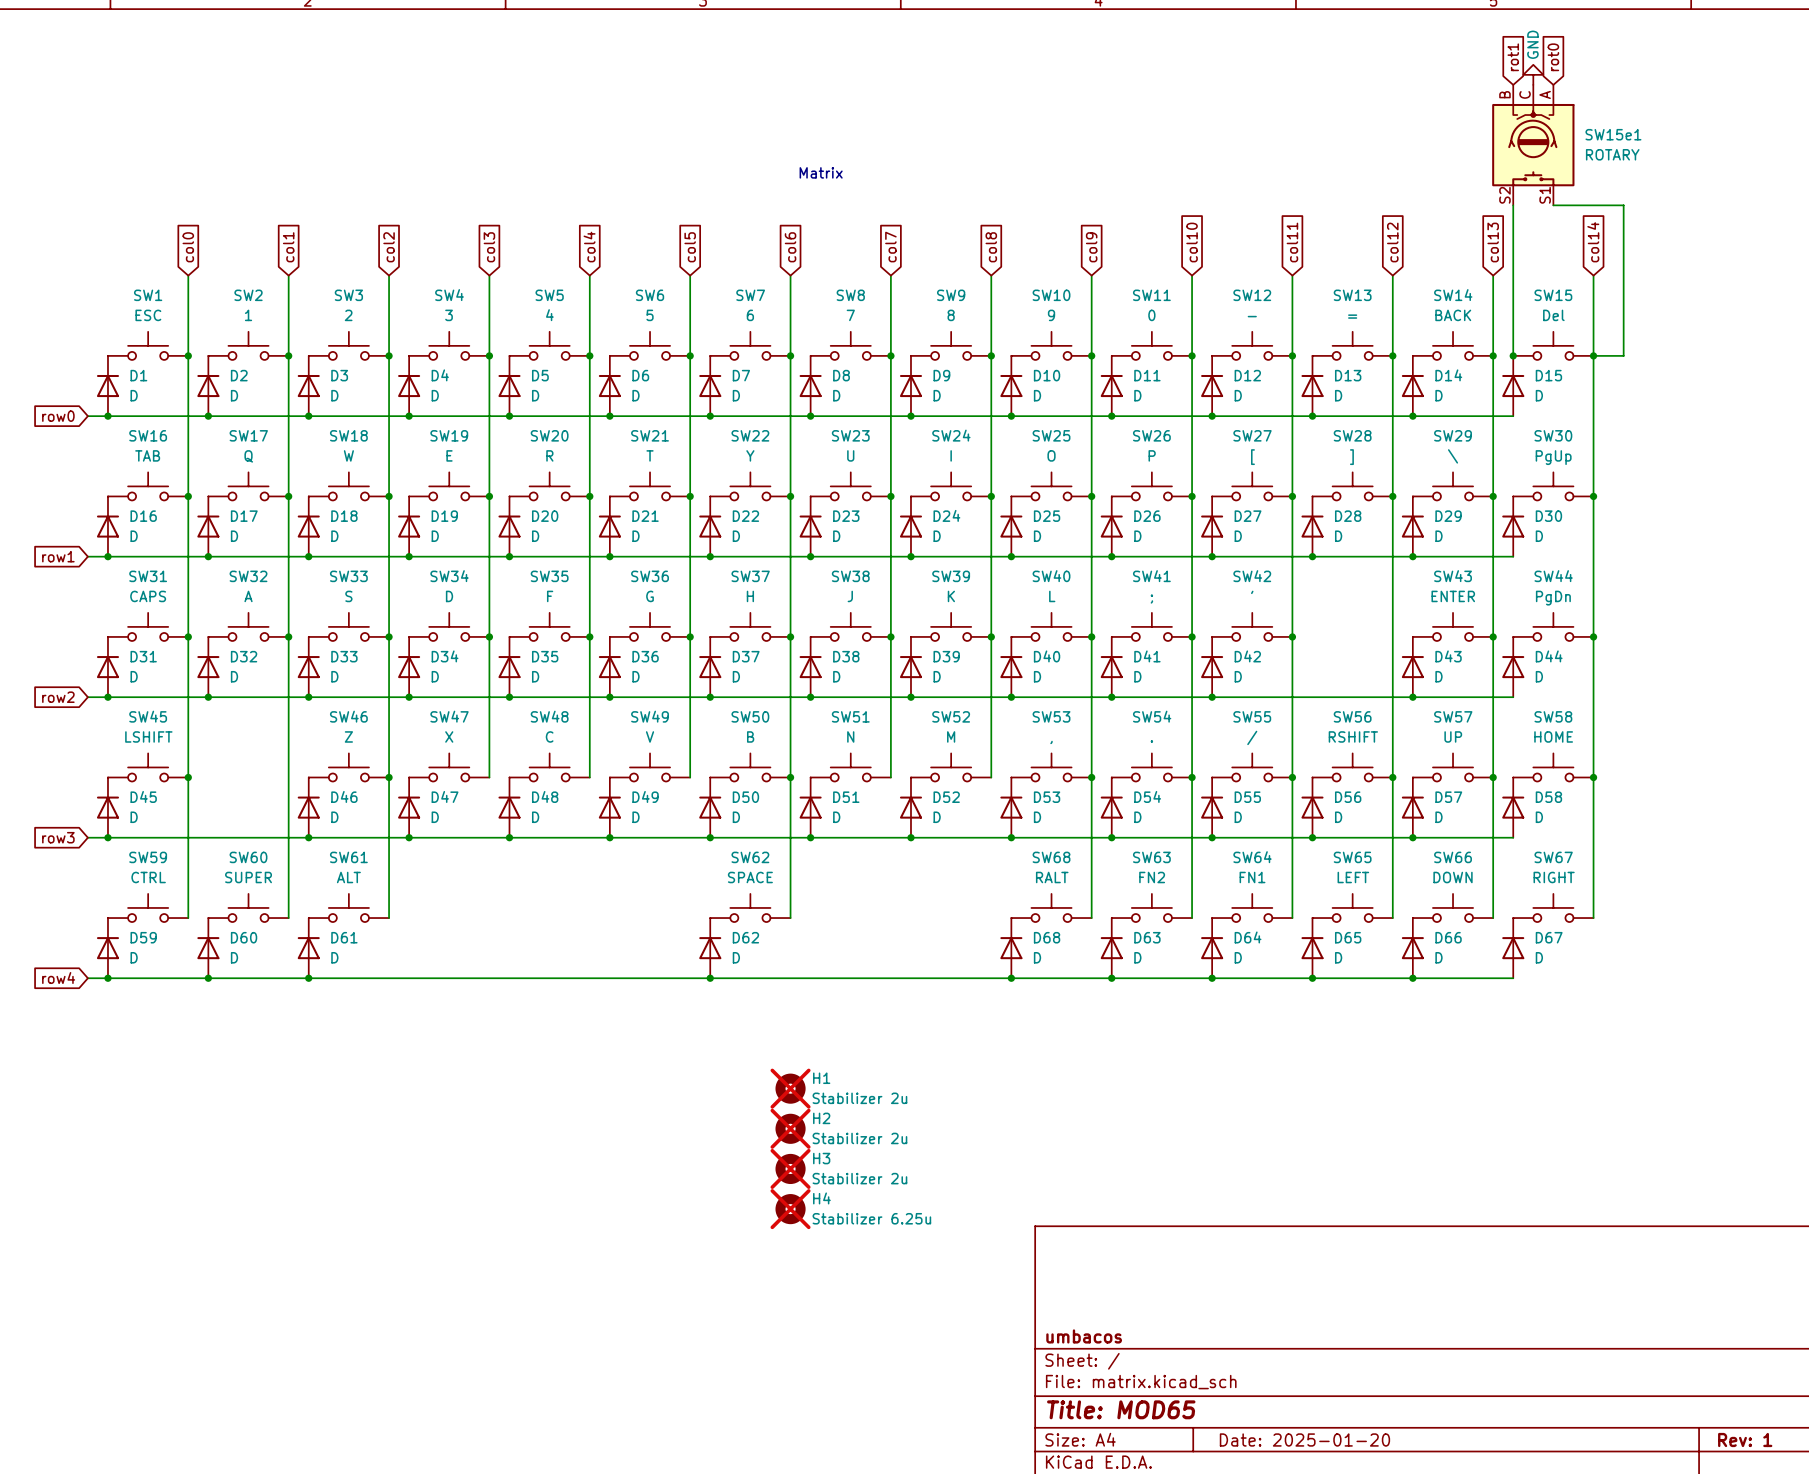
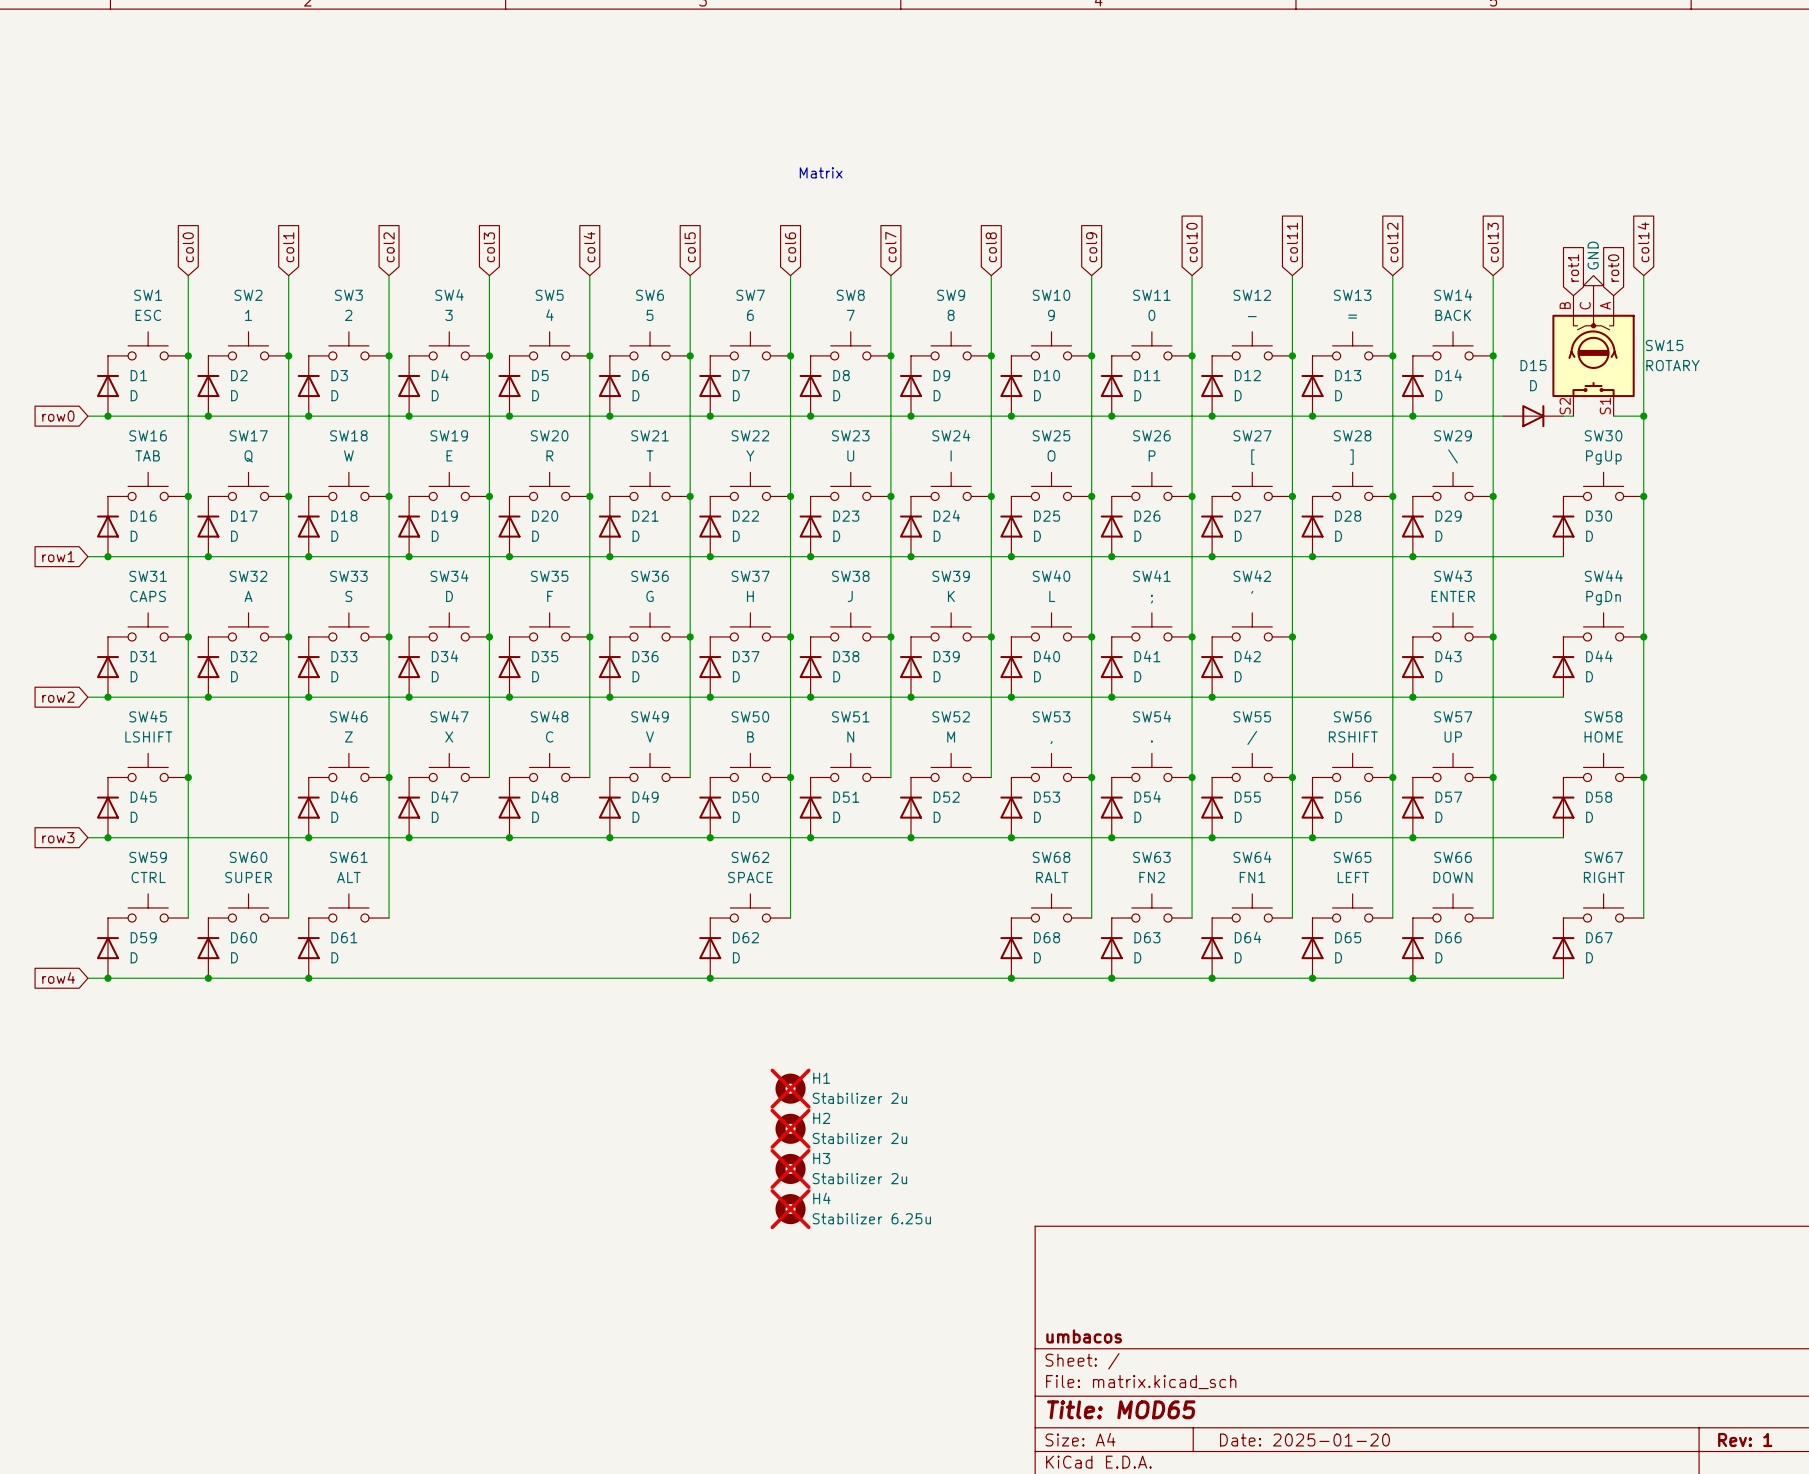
global label: rot1 (1513, 57) -> none
global label: rot0 (1553, 57) -> none
power symbol: GND (1533, 74) -> none
SW15e1: ROTARY (1533, 145) -> none
wire: (1513, 205) (1513, 355) -> none
wire: (1553, 205) (1623, 205) (1623, 355) (1593, 355) -> none
global label position: col14 (1593, 242) -> col14 (1643, 242)
global label: none -> rot1 (1573, 268)
global label: none -> rot0 (1613, 268)
wire: (1593, 275) (1593, 918) -> (1643, 275) (1643, 918)
power symbol: none -> GND (1593, 285)
SW15 name position: SW15 (1553, 295) -> SW15 (1664, 345)
SW15 value: Del (1553, 315) -> ROTARY (1672, 365)
SW15 symbol: [1513, 331, 1594, 360] -> [1552, 295, 1635, 417]
junction: (1513, 355) -> none
junction: (1593, 355) -> none
D15 name position: D15 (1548, 375) -> D15 (1533, 365)
D15 rotation: 0° (1513, 386) -> 90° clockwise (1533, 416)
D15 position: (1513, 386) -> (1533, 416)
D15 value position: D (1539, 395) -> D (1533, 385)
wire: none -> (1613, 416) (1643, 416)
junction: none -> (1643, 416)
SW30 position: (1553, 486) -> (1603, 486)
junction: (1593, 496) -> none
junction: none -> (1643, 496)
D30 position: (1513, 526) -> (1563, 526)
wire: none -> (1513, 556) (1563, 556)
SW44 position: (1553, 626) -> (1603, 626)
junction: (1593, 636) -> none
junction: none -> (1643, 636)
D44 position: (1513, 667) -> (1563, 667)
wire: none -> (1513, 697) (1563, 697)
SW58 position: (1553, 767) -> (1603, 767)
junction: (1593, 777) -> none
junction: none -> (1643, 777)
D58 position: (1513, 807) -> (1563, 807)
wire: none -> (1513, 837) (1563, 837)
SW67 position: (1553, 907) -> (1603, 907)
D67 position: (1513, 948) -> (1563, 948)
wire: none -> (1513, 978) (1563, 978)

